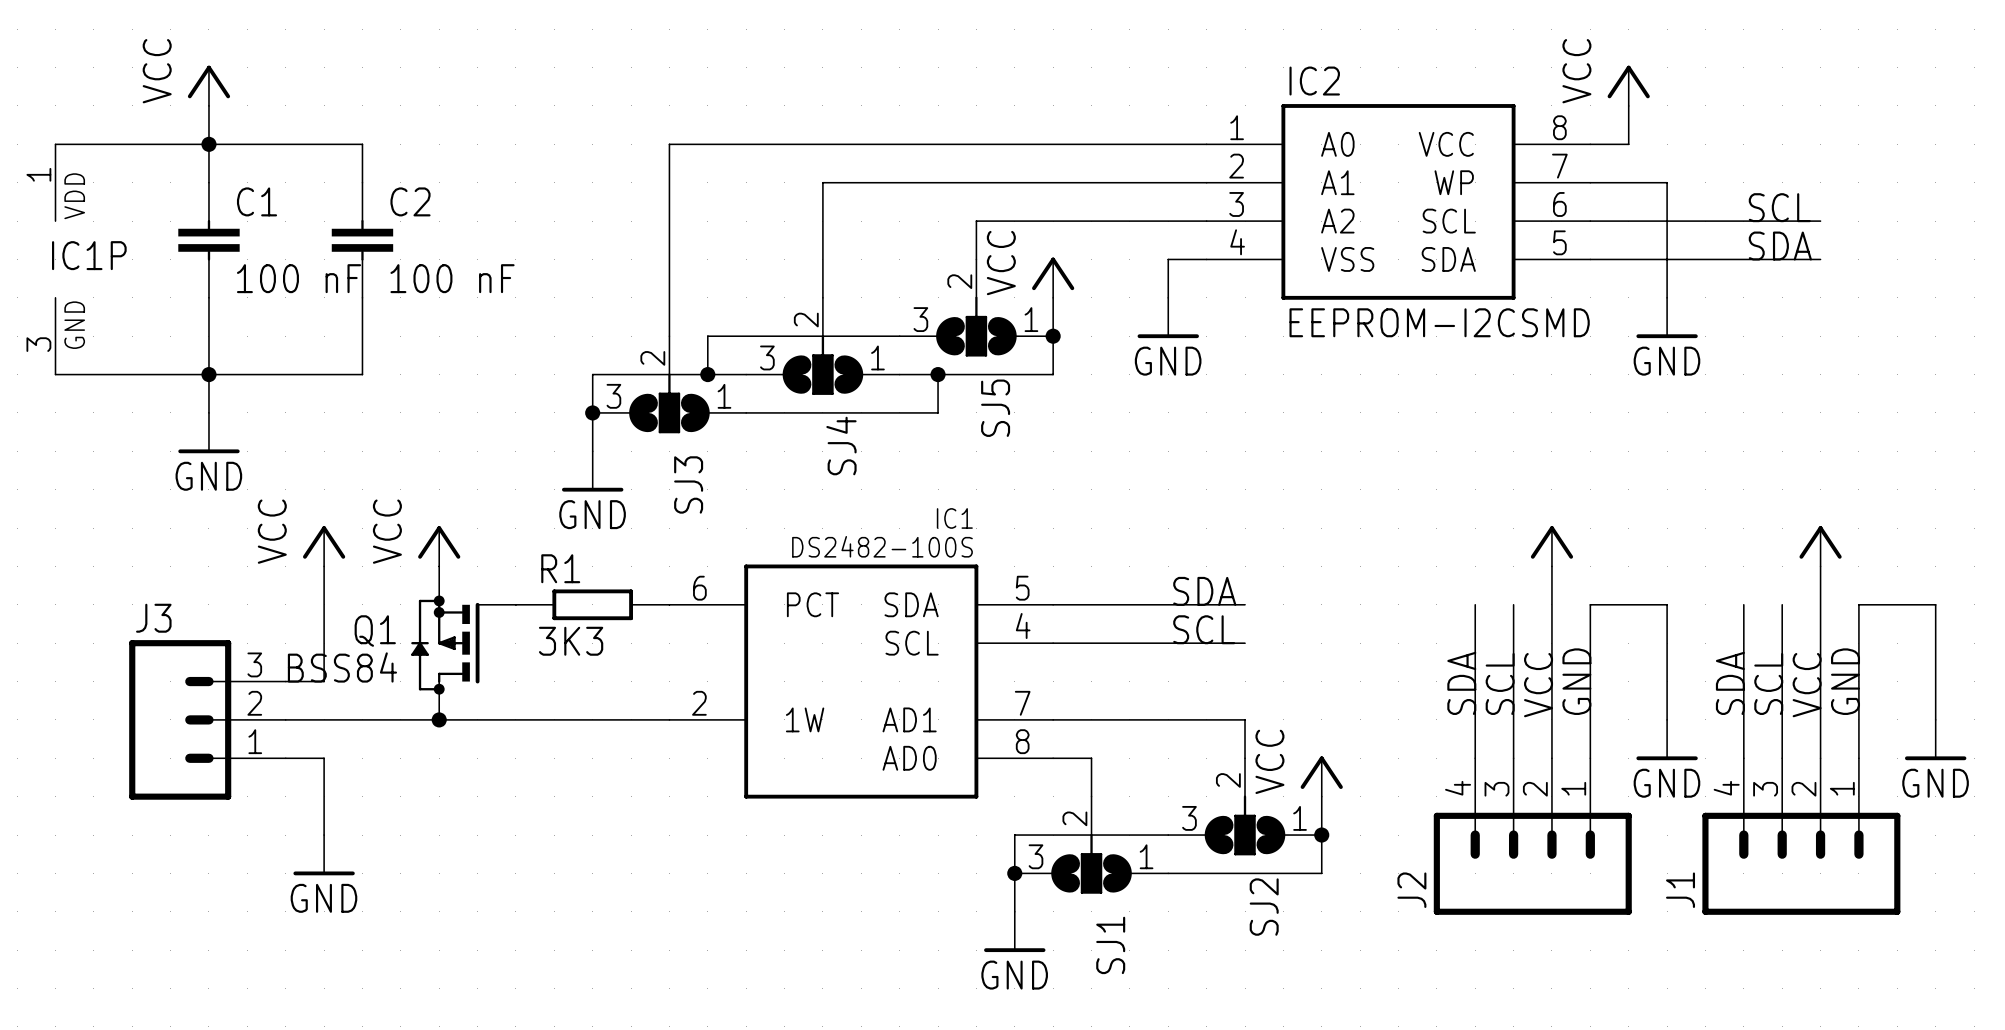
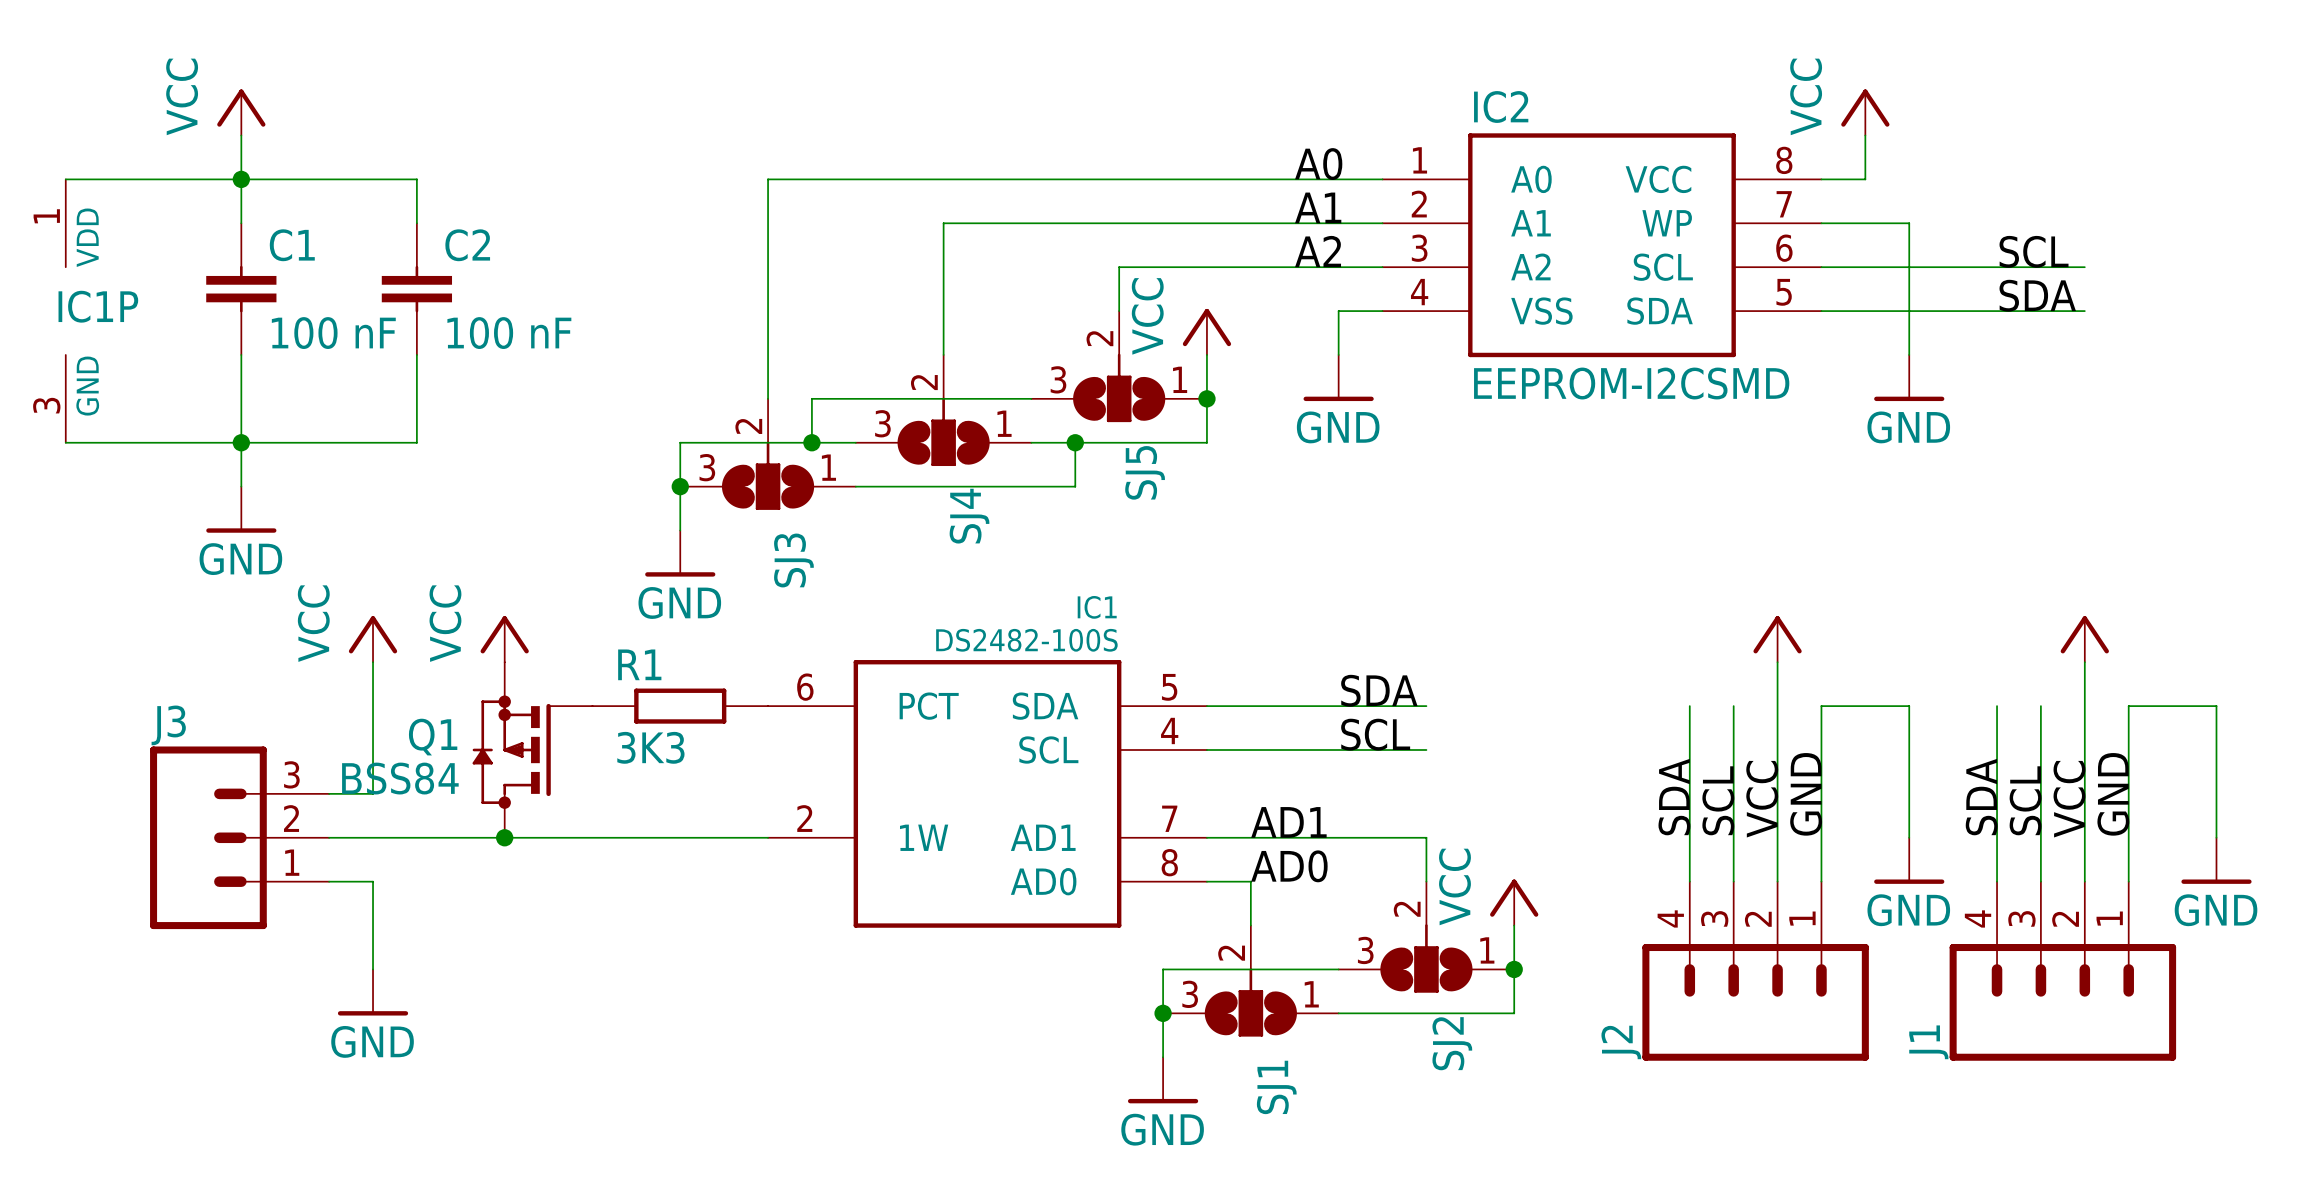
label: none -> A0 (1318, 164)
label: none -> A1 (1318, 207)
label: none -> A2 (1318, 251)
label: none -> AD1 (1288, 822)
label: none -> AD0 (1289, 866)

